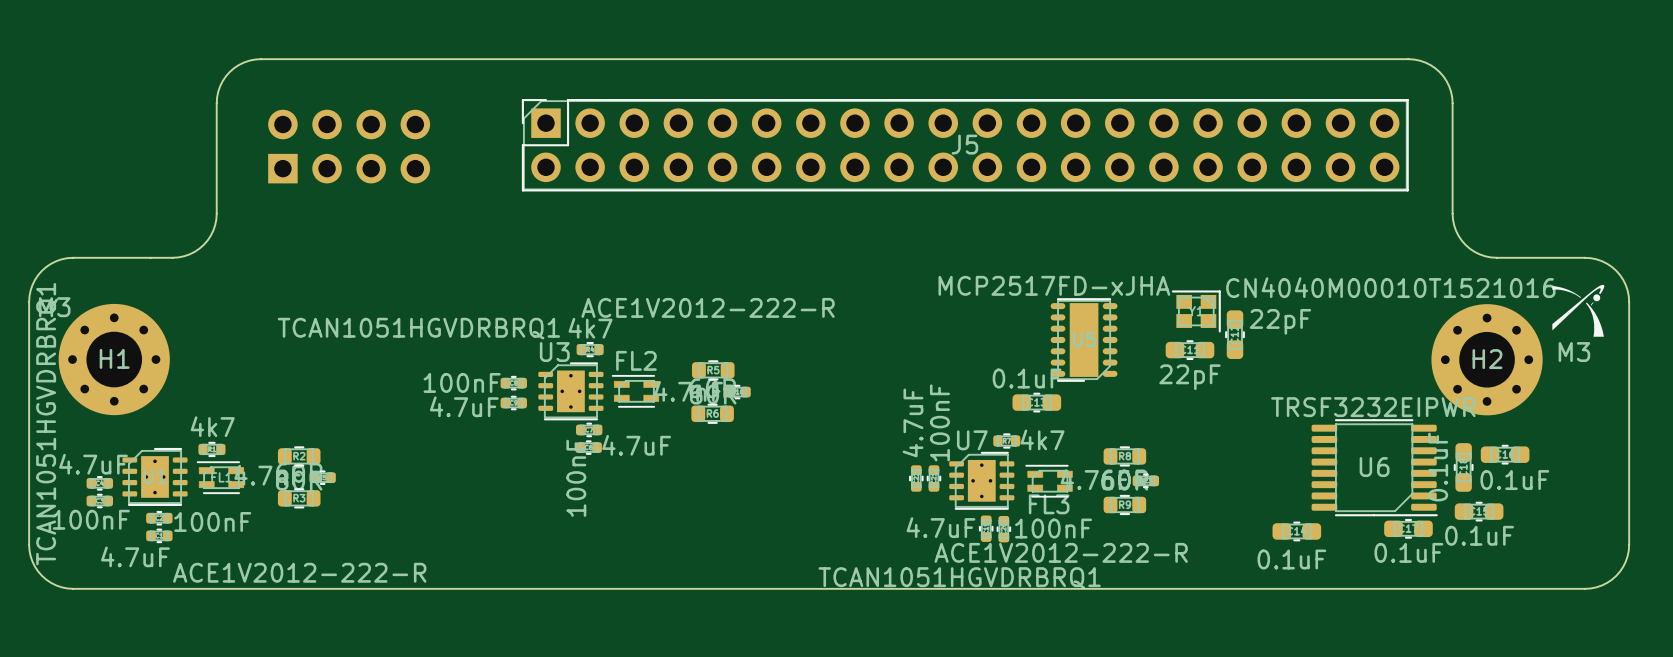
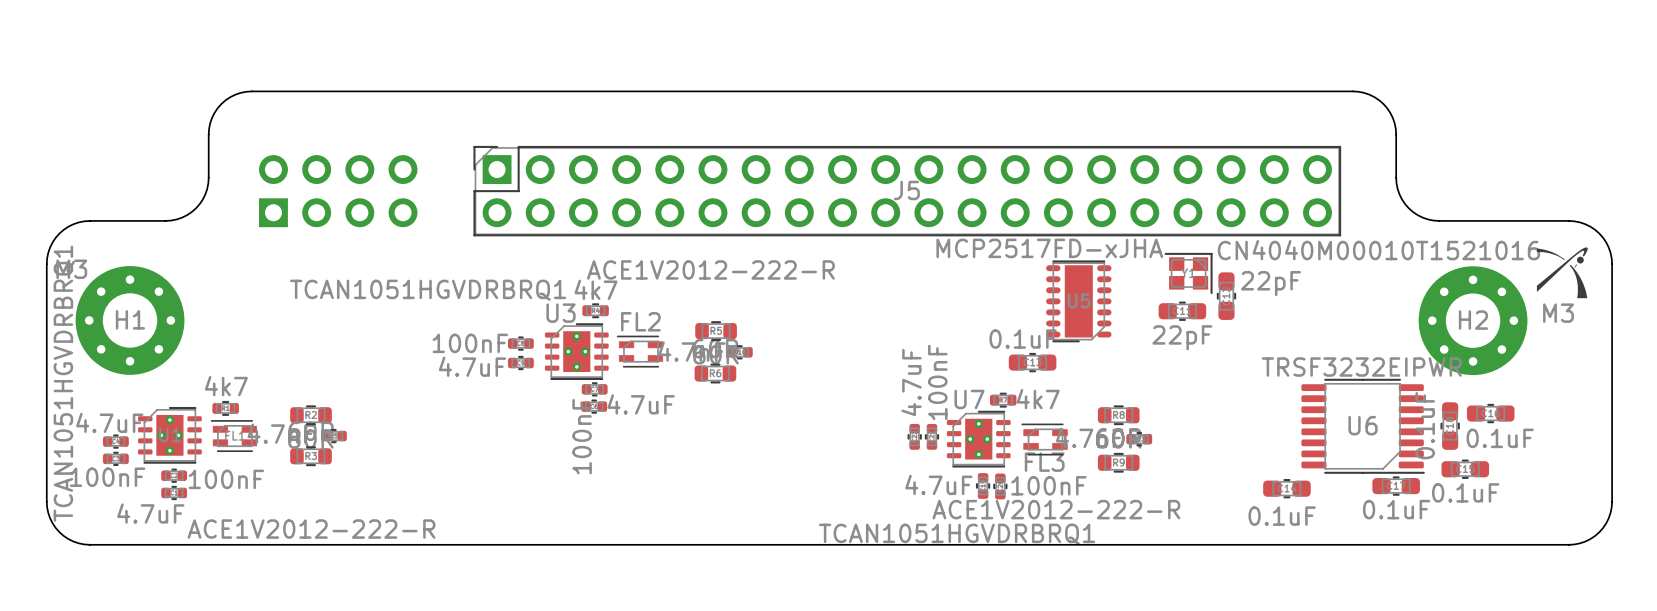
J5 position: (965, 145) -> (907, 191)
part position: (349, 146) -> (338, 191)
board edge: (150, 257) (178, 257) (189, 254) (203, 244) (210, 235) (215, 225) (216, 213) (218, 91) (222, 81) (233, 68) (249, 60) (260, 59) (1414, 59) (1425, 62) (1435, 68) (1446, 81) (1451, 91) (1452, 213) (1455, 230) (1461, 240) (1469, 248) (1479, 254) (1496, 257) -> (165, 220) (187, 215) (202, 199) (208, 183) (208, 134) (211, 118) (225, 100) (235, 94) (251, 91) (1358, 91) (1379, 100) (1392, 118) (1396, 134) (1396, 183) (1401, 199) (1408, 208) (1417, 215) (1433, 220) (1482, 220)

